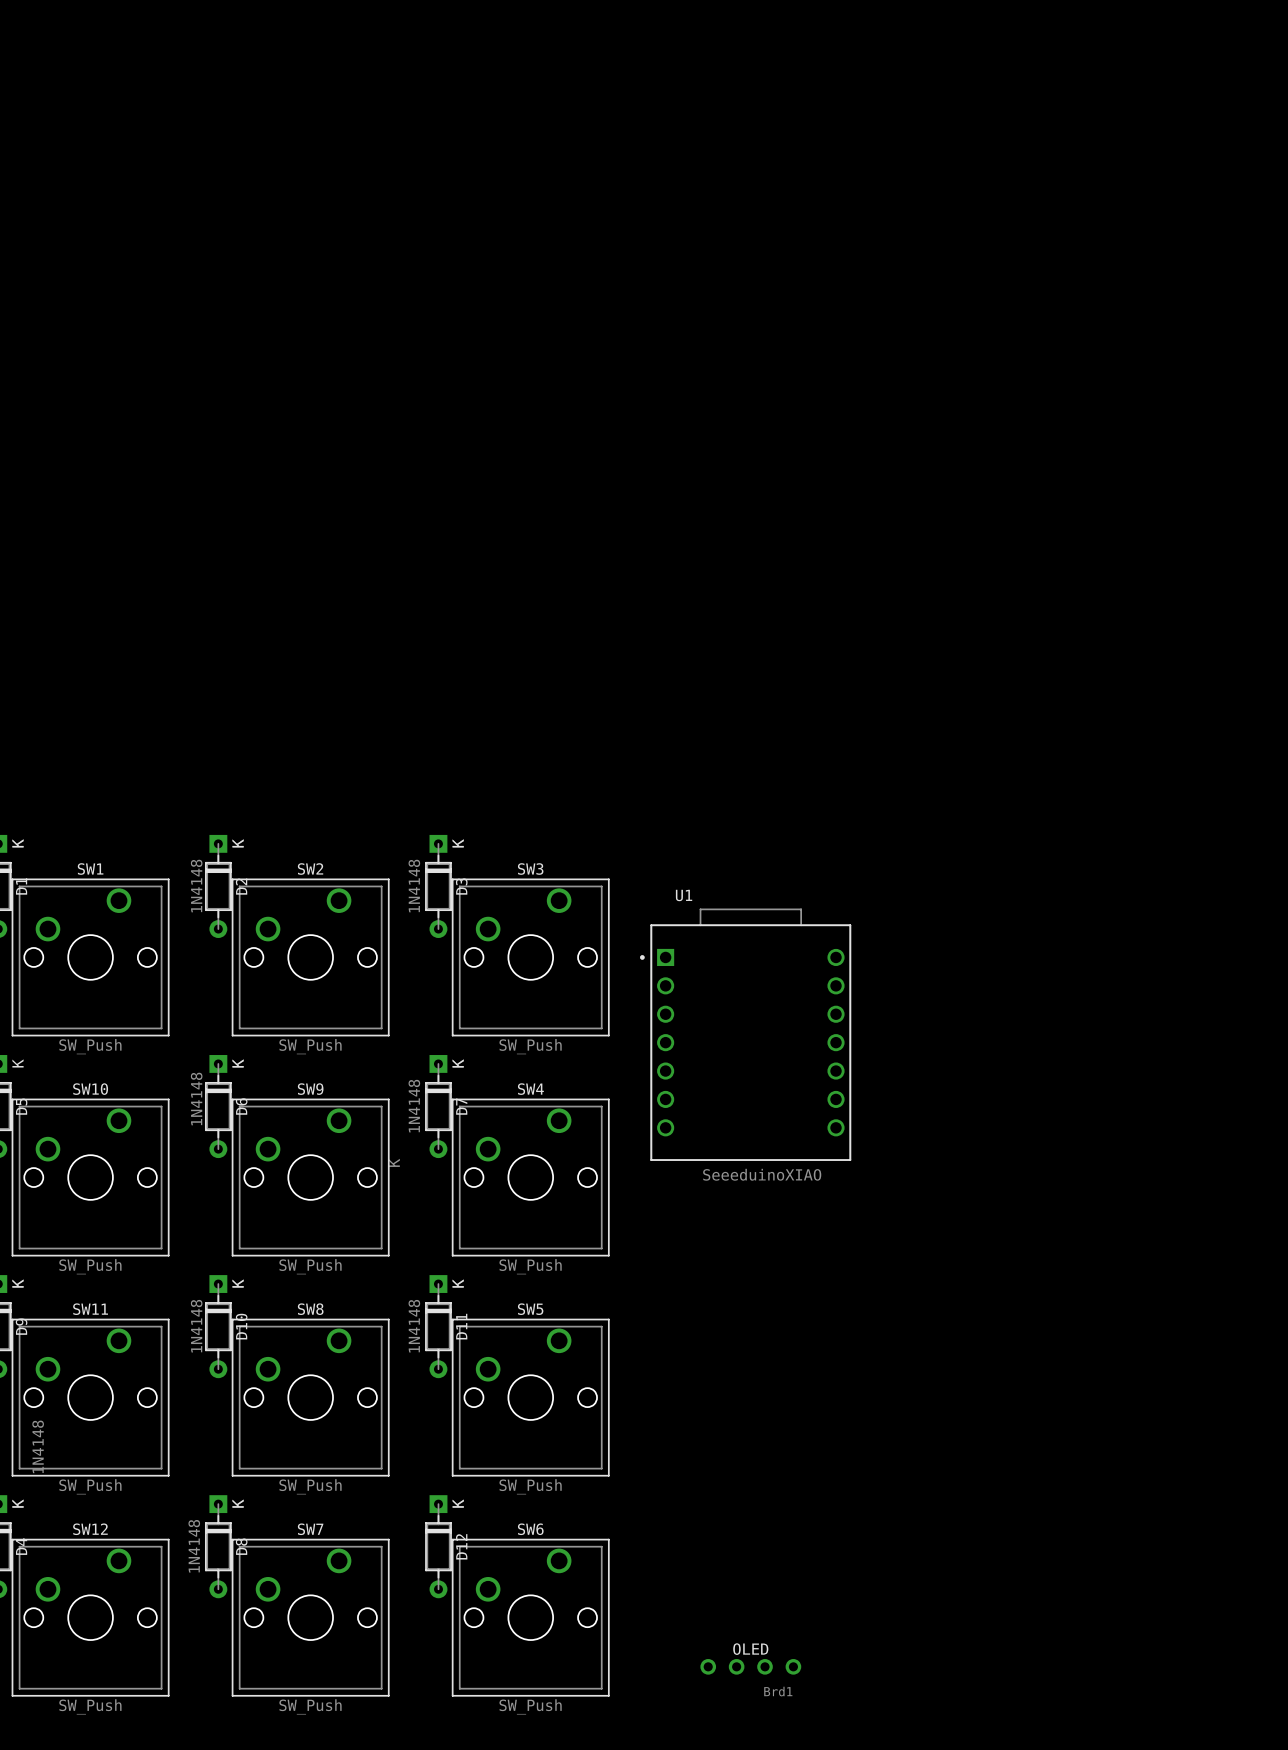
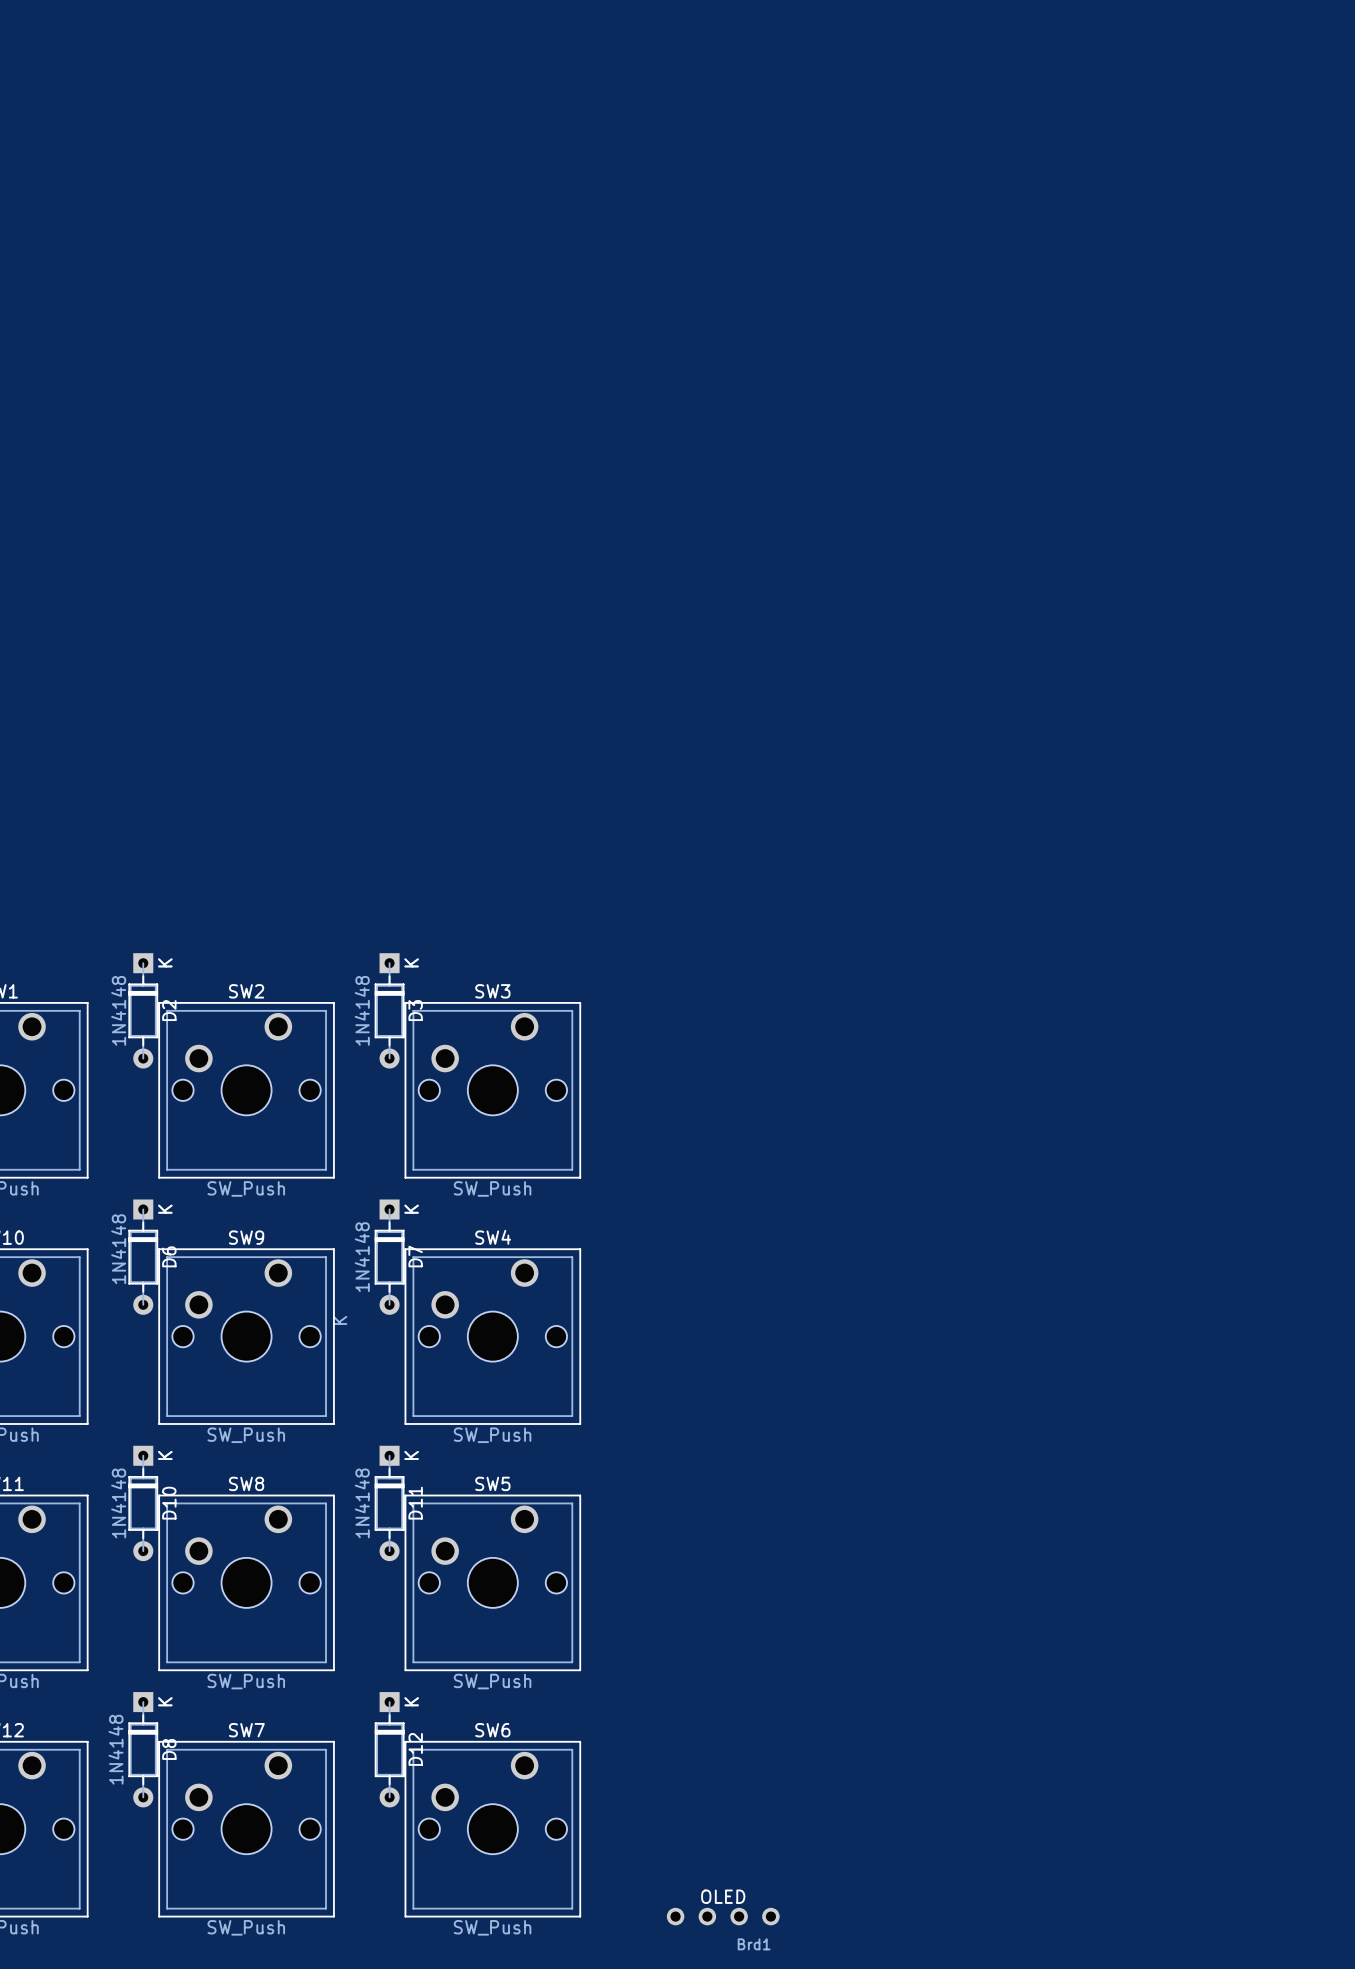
U1: SeeeduinoXIAO (745, 1034) -> none
Brd1 position: (750, 1666) -> (723, 1916)

